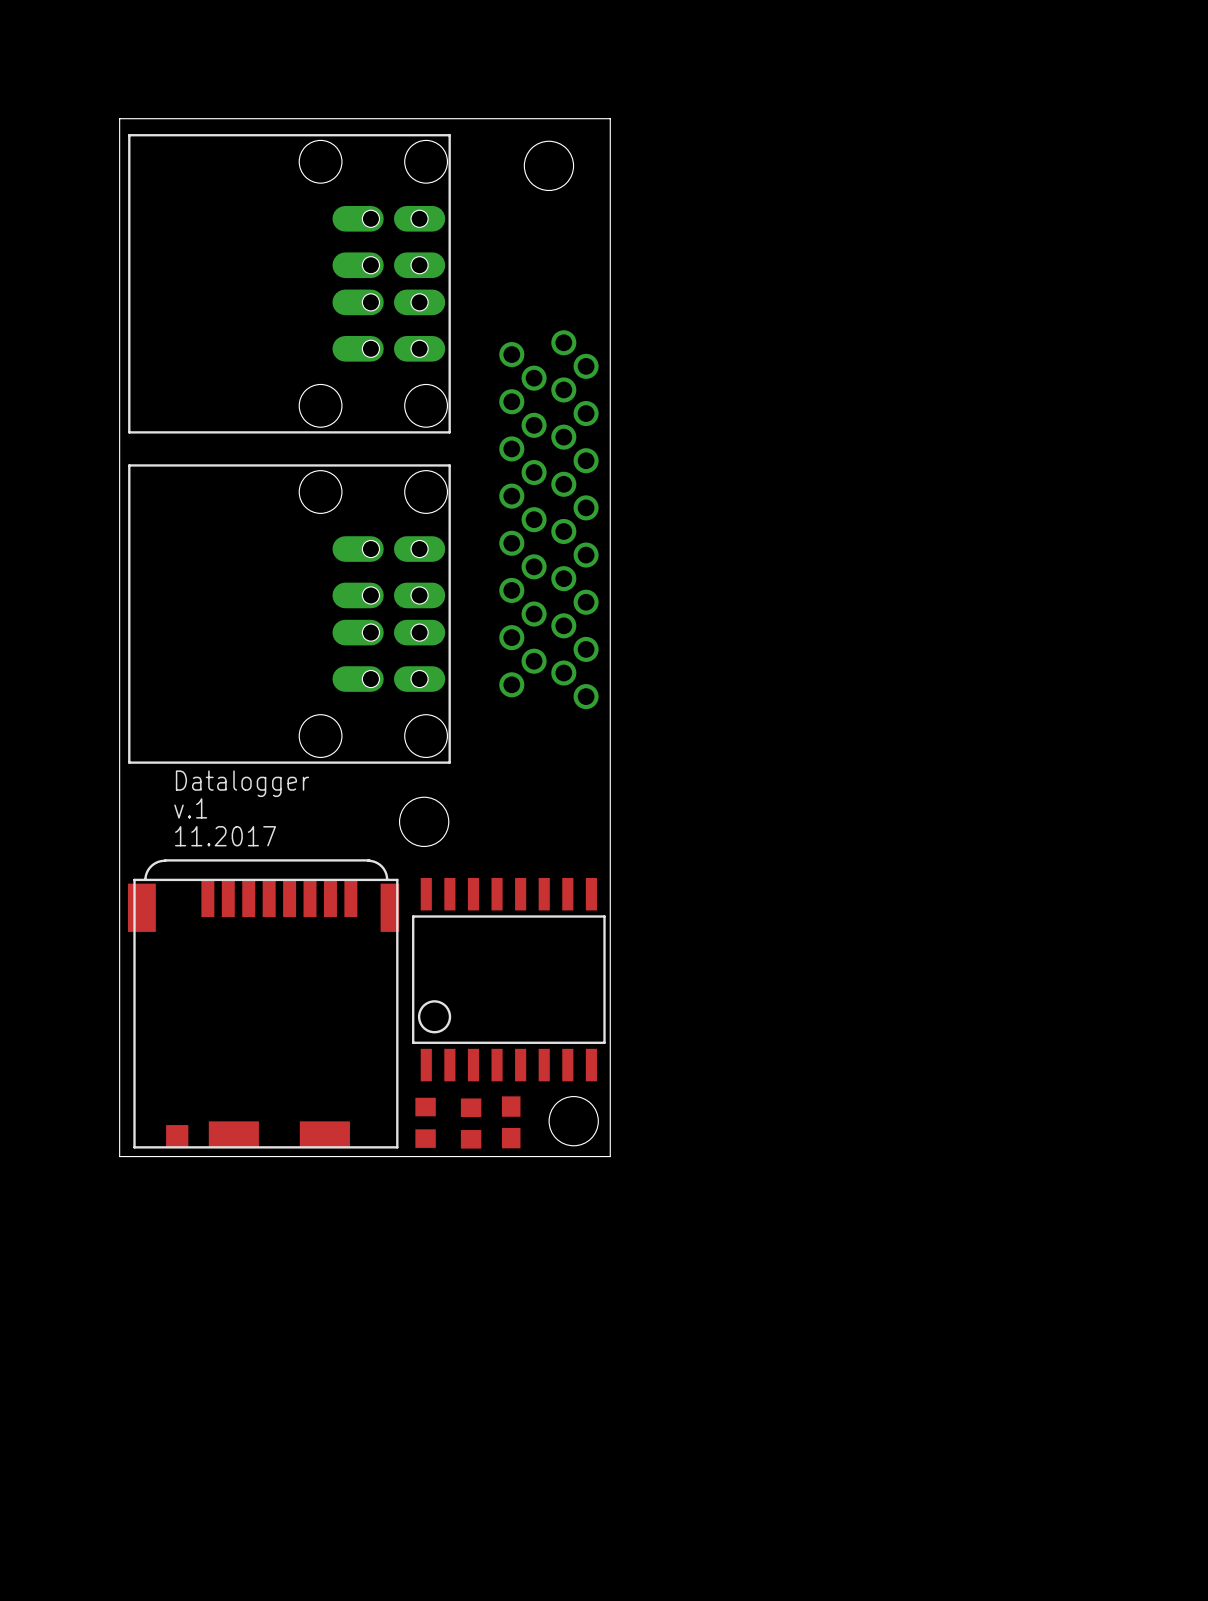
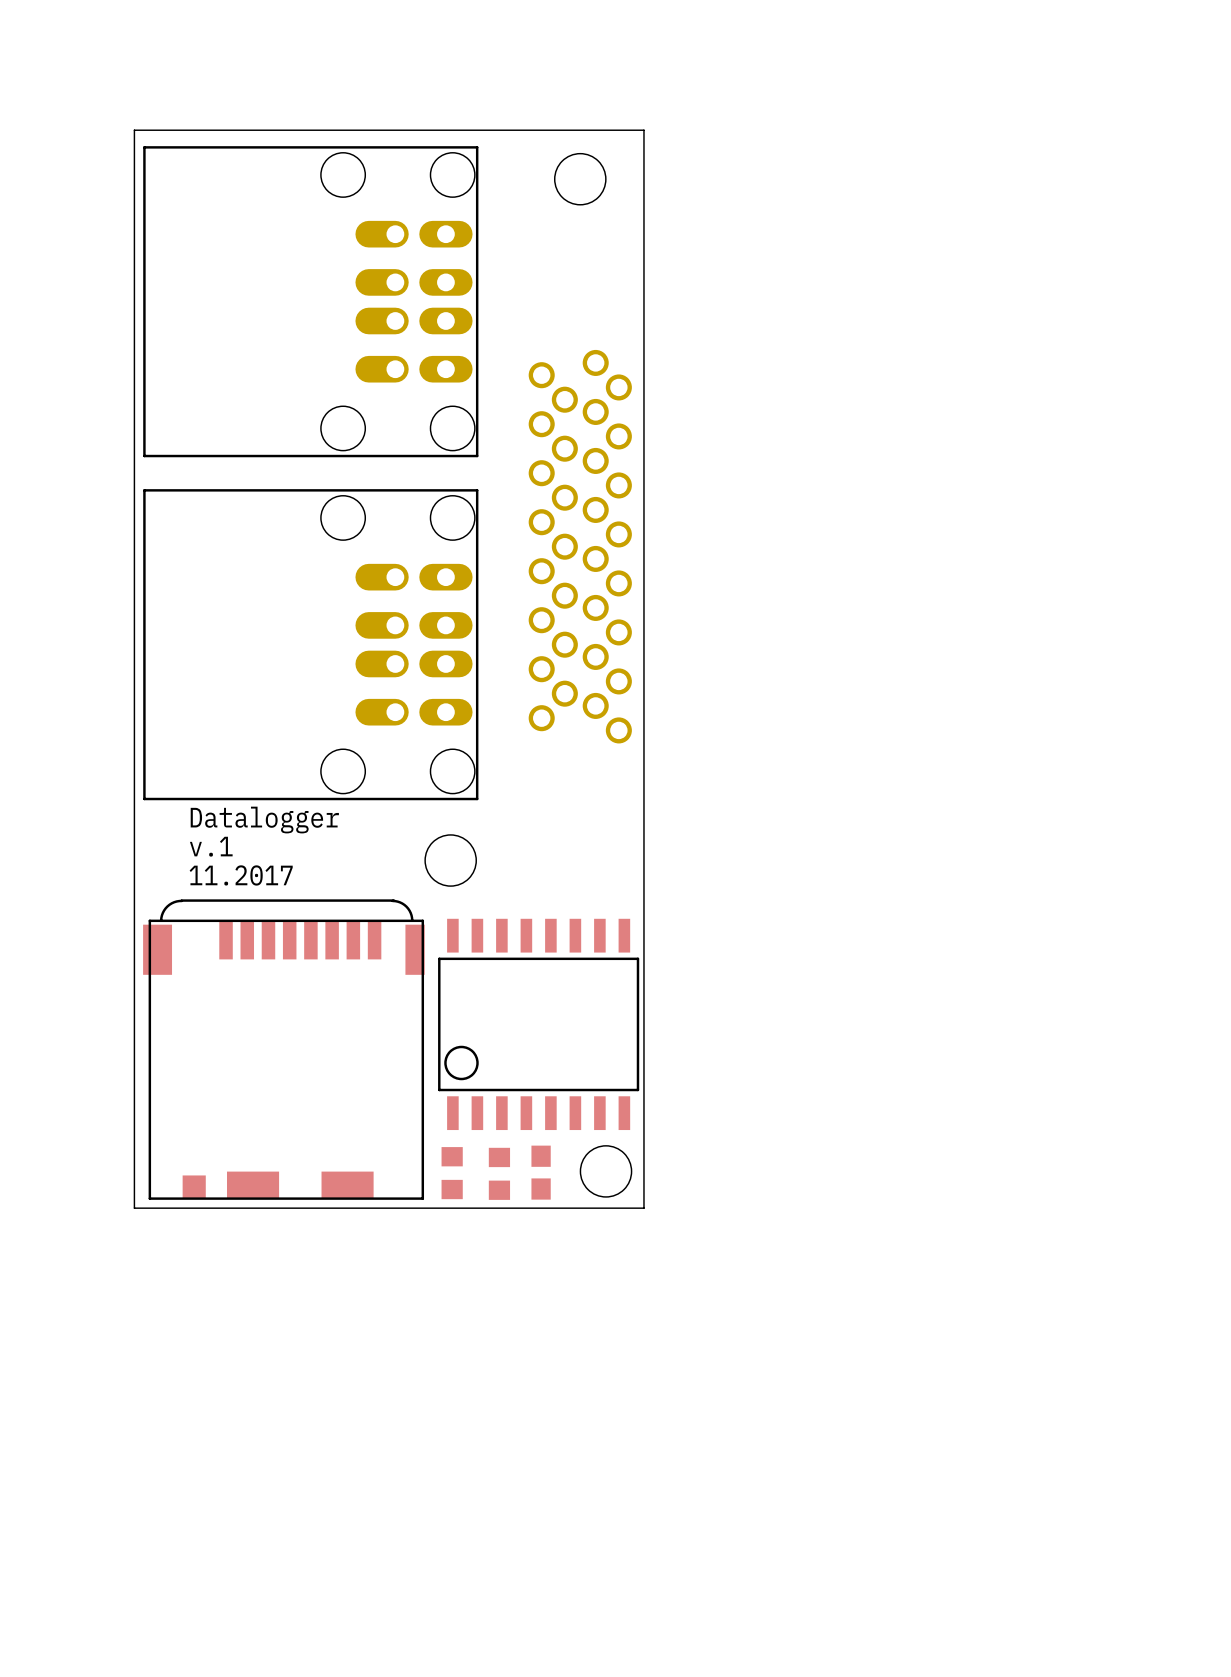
part footprint: [128, 134, 451, 434] -> [143, 146, 479, 458]
part footprint: [128, 464, 451, 764] -> [143, 489, 479, 801]

